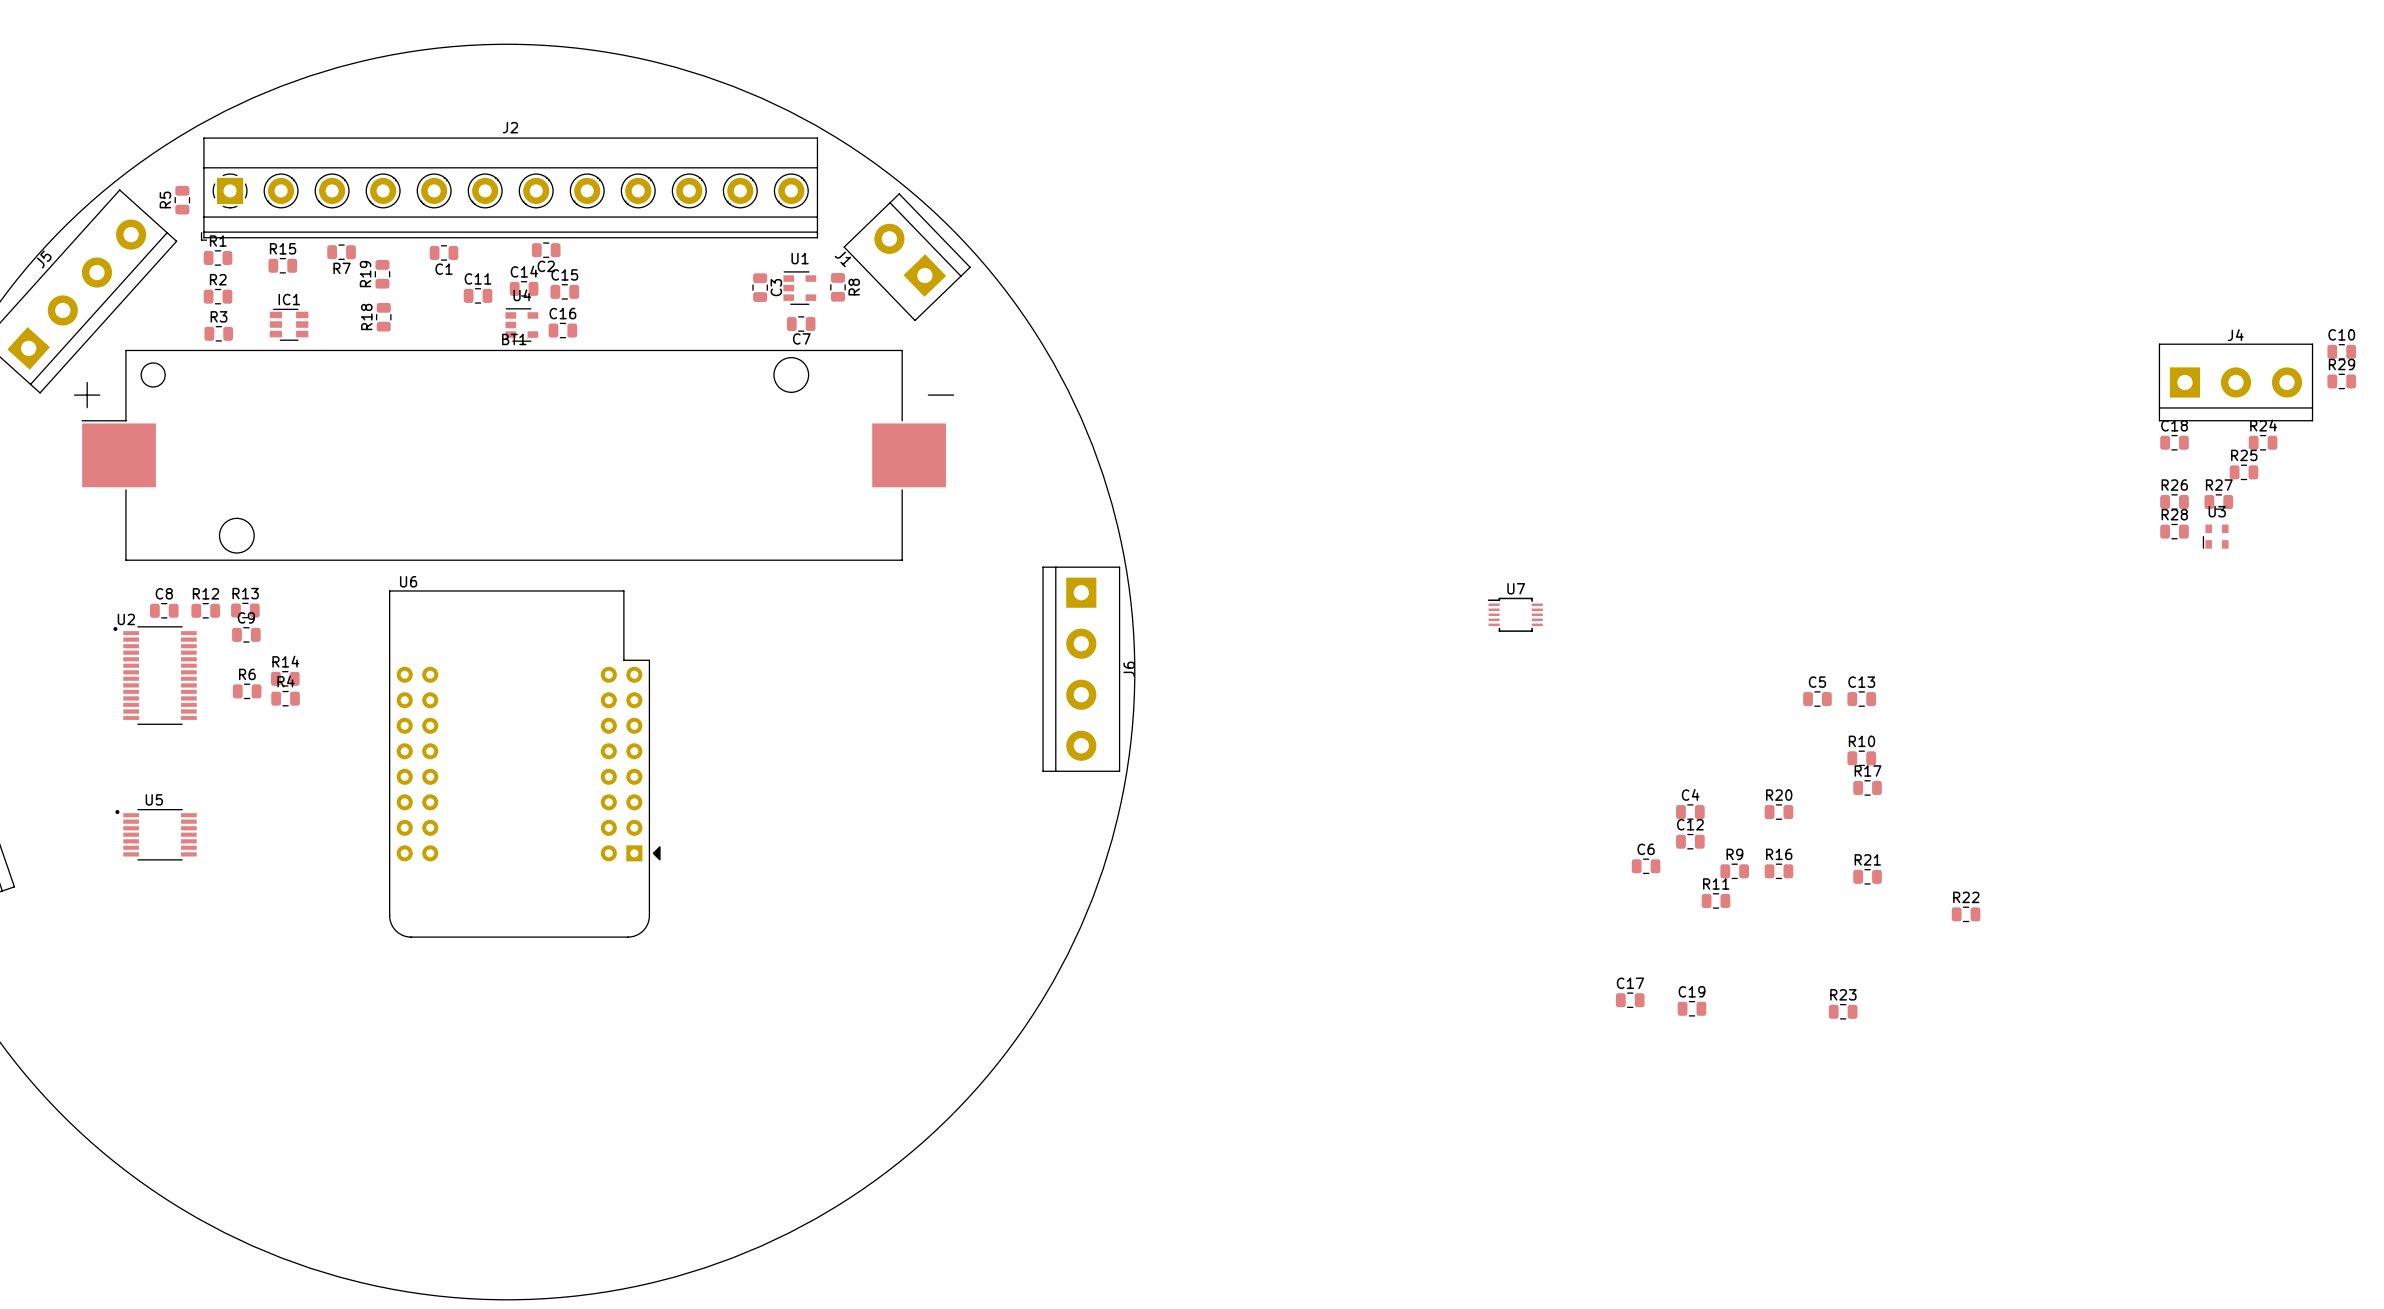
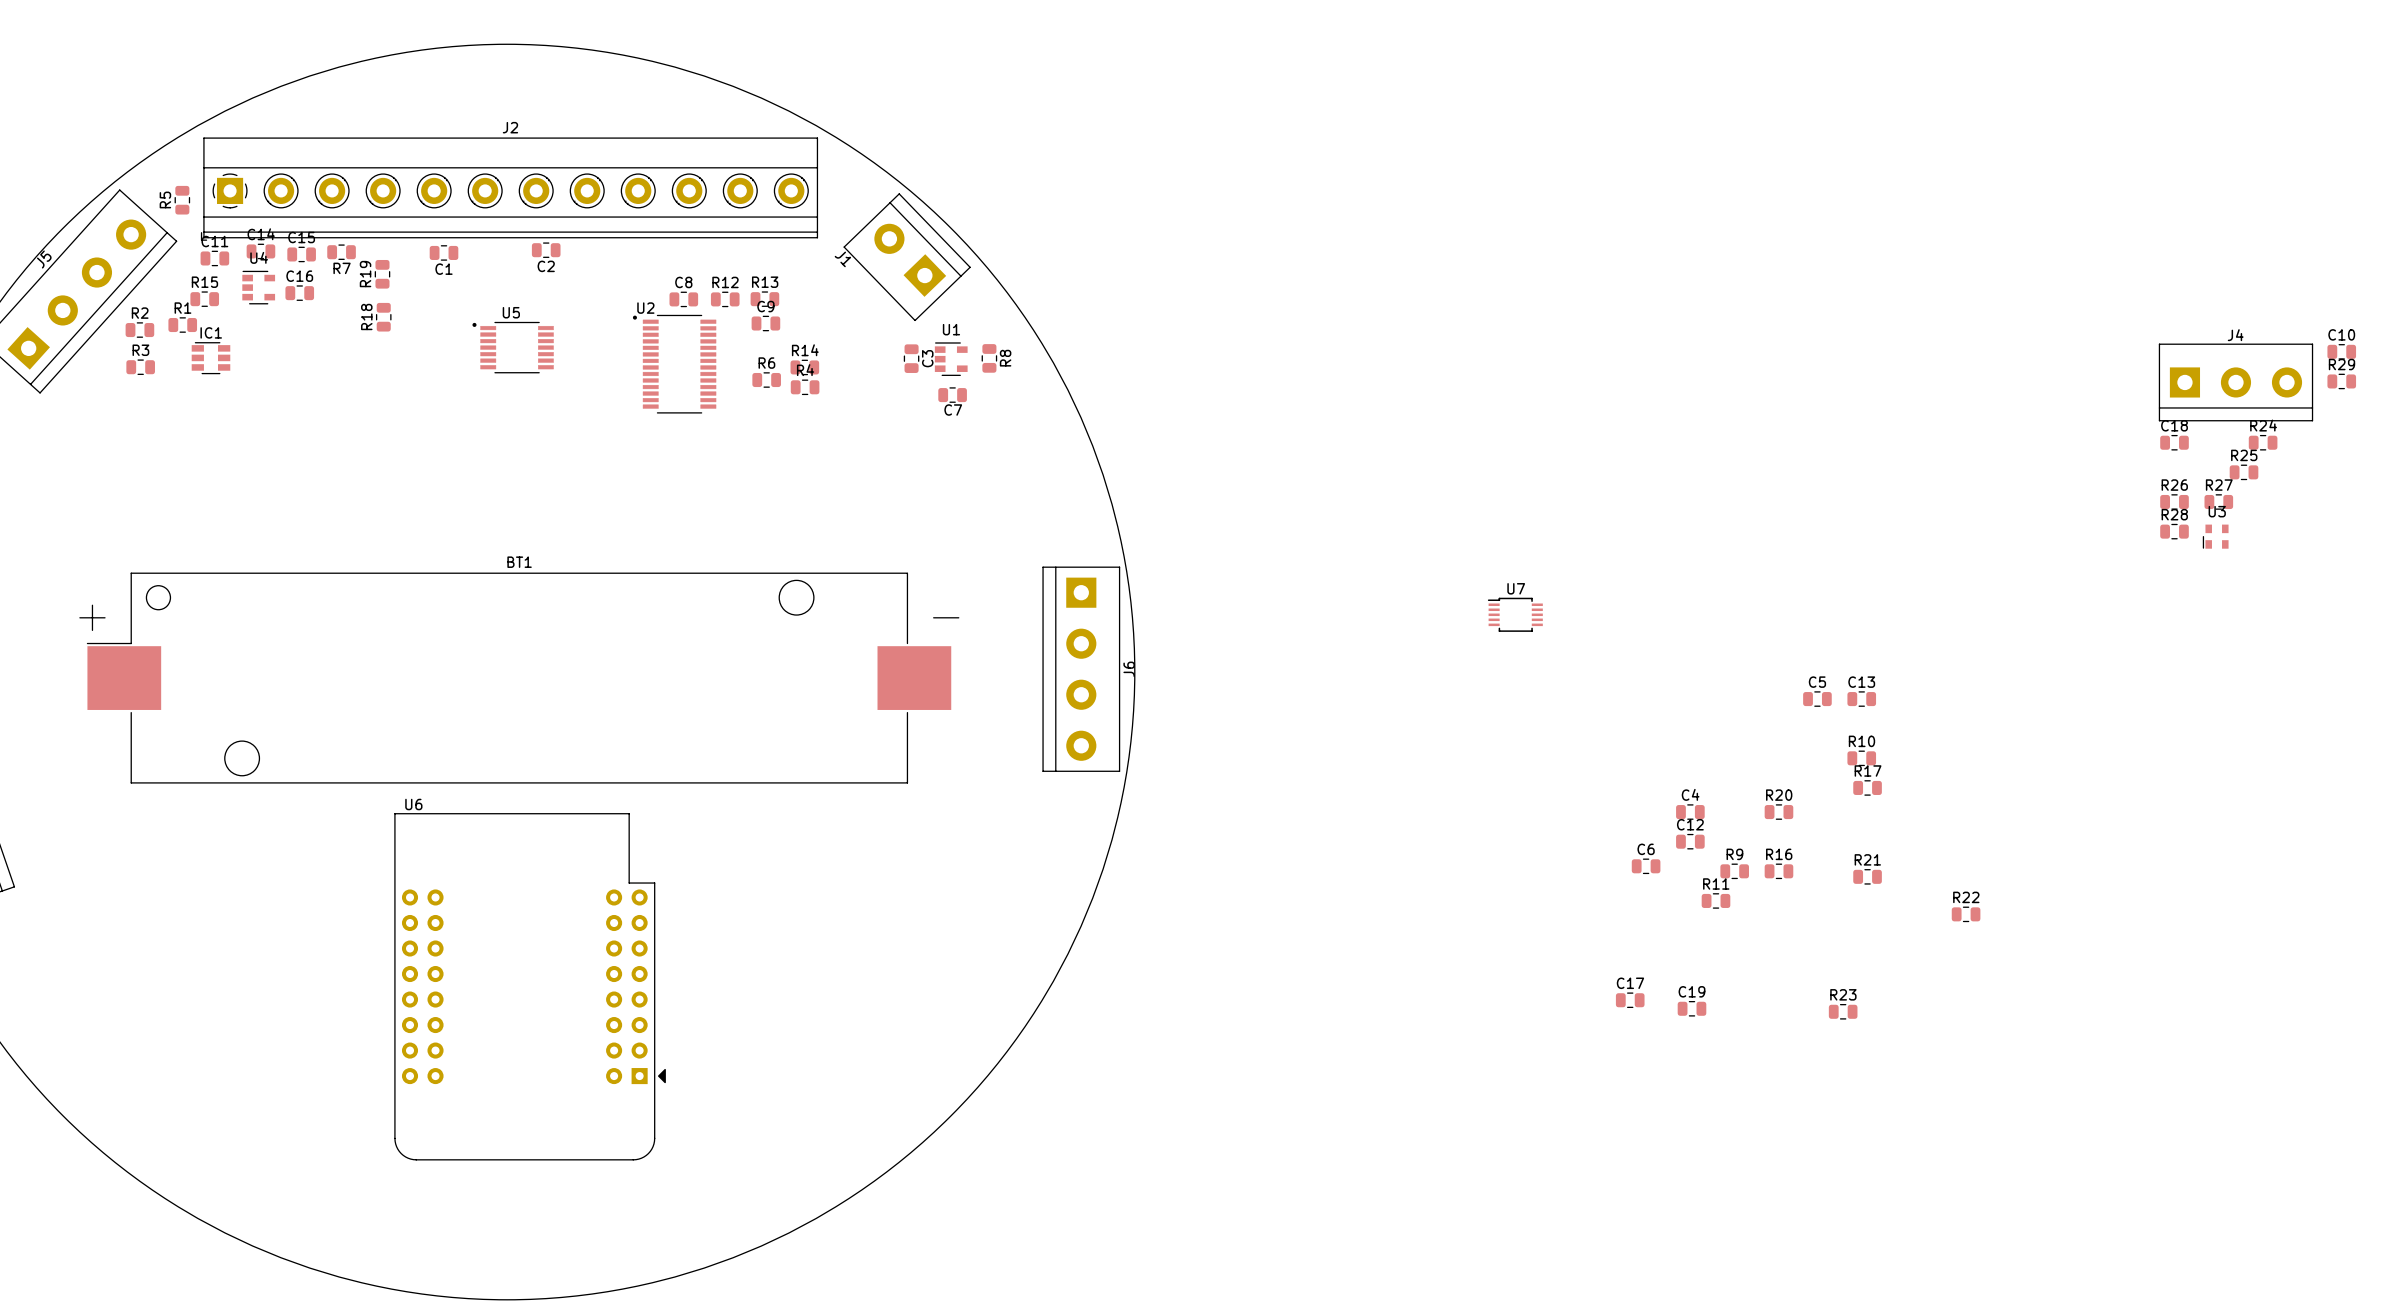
R1 position: (218, 257) -> (182, 325)
R15 position: (282, 265) -> (204, 299)
C3 position: (760, 287) -> (911, 358)
R8 position: (837, 287) -> (989, 358)
C14 position: (524, 288) -> (260, 251)
U1 position: (799, 288) -> (951, 359)
C15 position: (564, 291) -> (301, 254)
C11 position: (478, 295) -> (214, 258)
R2 position: (218, 296) -> (139, 330)
IC1 position: (289, 324) -> (210, 358)
C7 position: (801, 324) -> (952, 395)
U4 position: (521, 325) -> (258, 287)
C16 position: (562, 330) -> (299, 293)
R3 position: (218, 333) -> (140, 367)
BT1 position: (514, 455) -> (519, 678)
C8 position: (164, 610) -> (683, 299)
R12 position: (205, 610) -> (725, 299)
R13 position: (245, 610) -> (764, 299)
C9 position: (246, 634) -> (765, 323)
U2 position: (155, 675) -> (674, 364)
R14 position: (285, 678) -> (804, 367)
R6 position: (247, 691) -> (766, 380)
R4 position: (285, 698) -> (805, 387)
U6 position: (524, 764) -> (530, 986)
U5 position: (156, 834) -> (513, 347)

